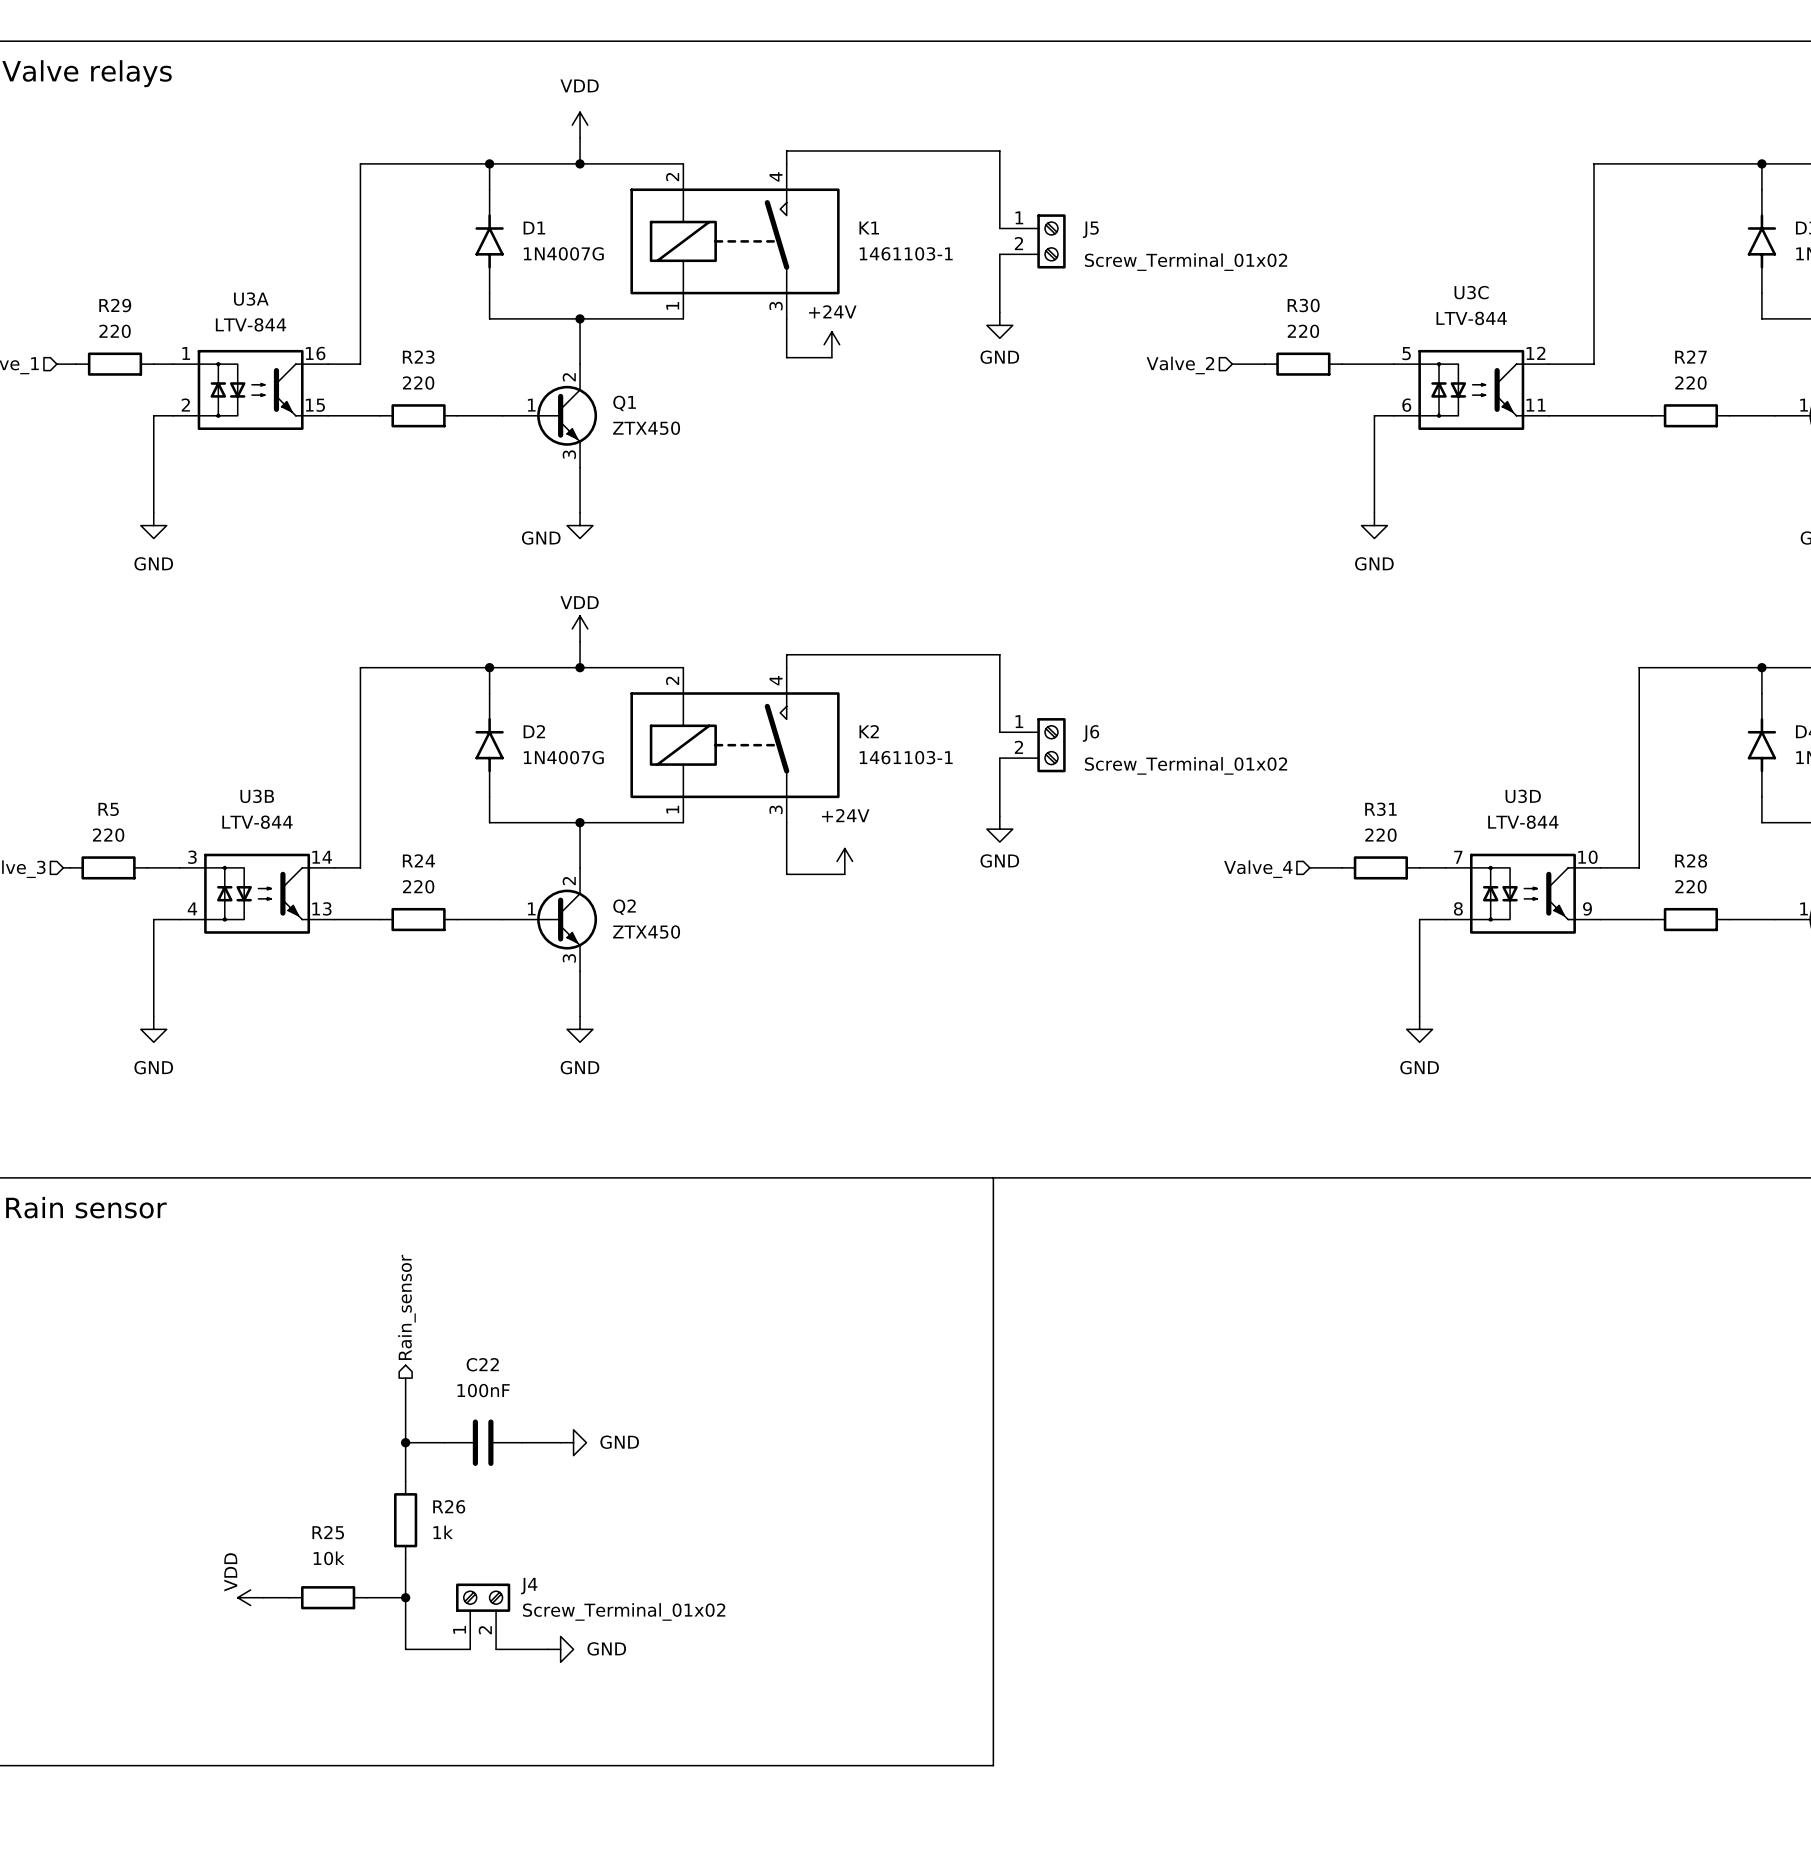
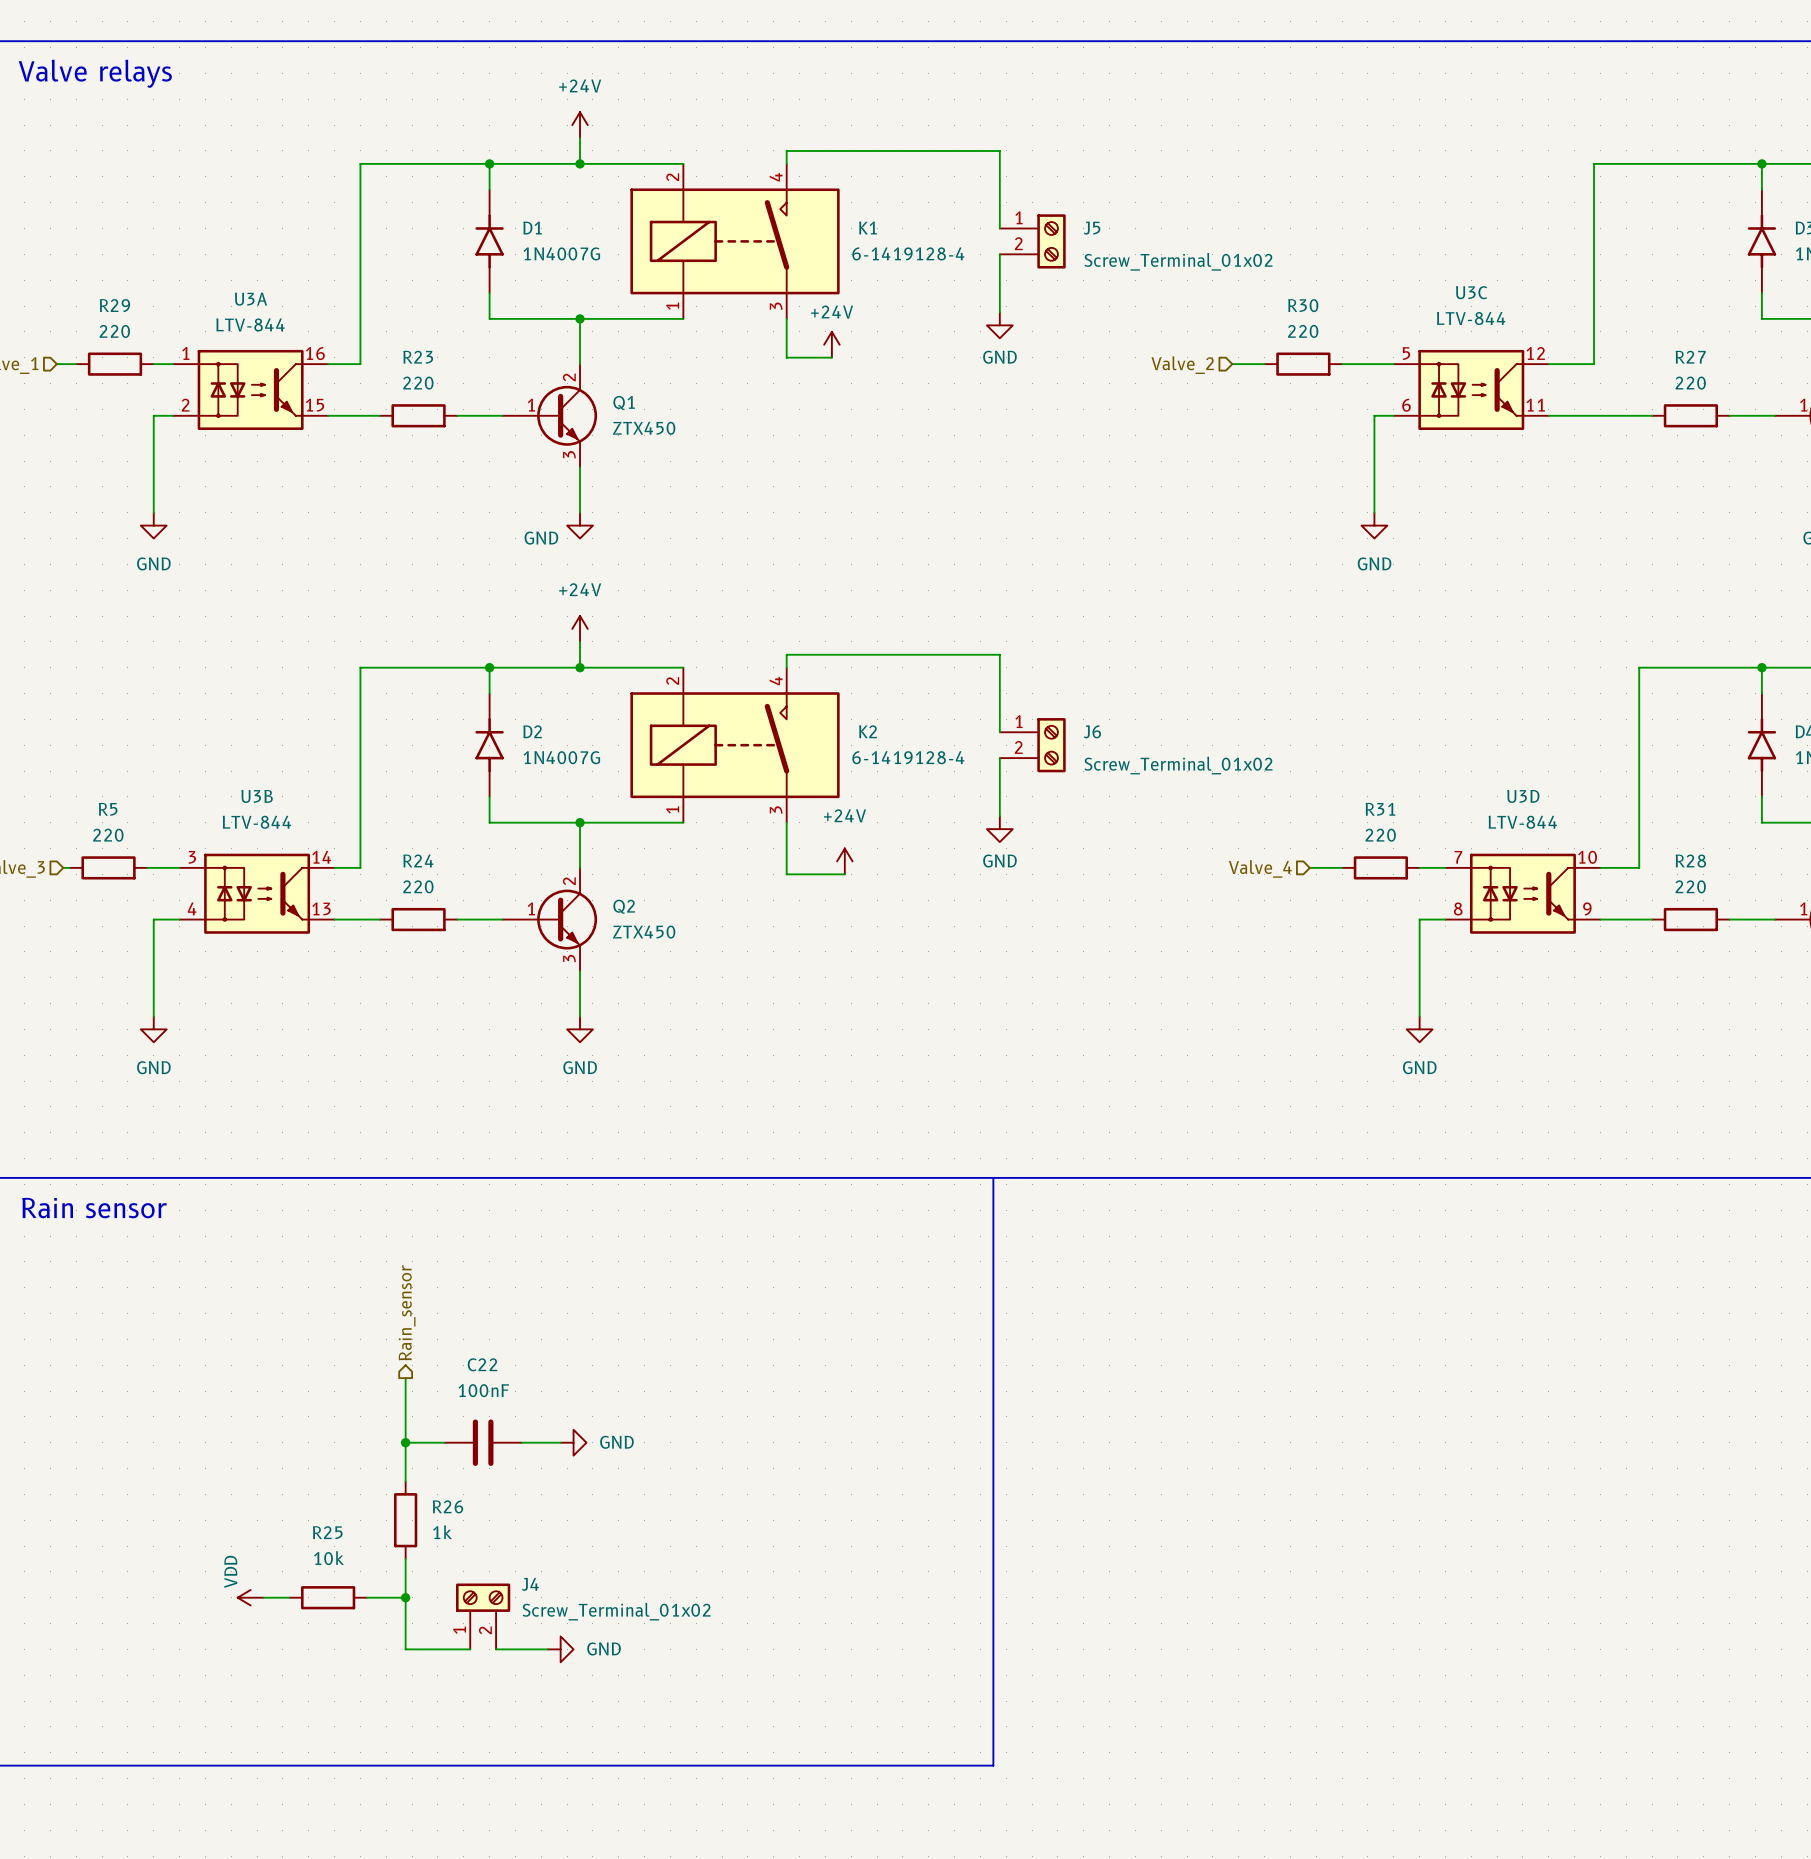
power symbol: VDD (580, 125) -> +24V (580, 125)
K1 value: 1461103-1 (906, 253) -> 6-1419128-4 (908, 253)
power symbol: VDD (580, 628) -> +24V (580, 628)
K2 value: 1461103-1 (906, 757) -> 6-1419128-4 (908, 757)

